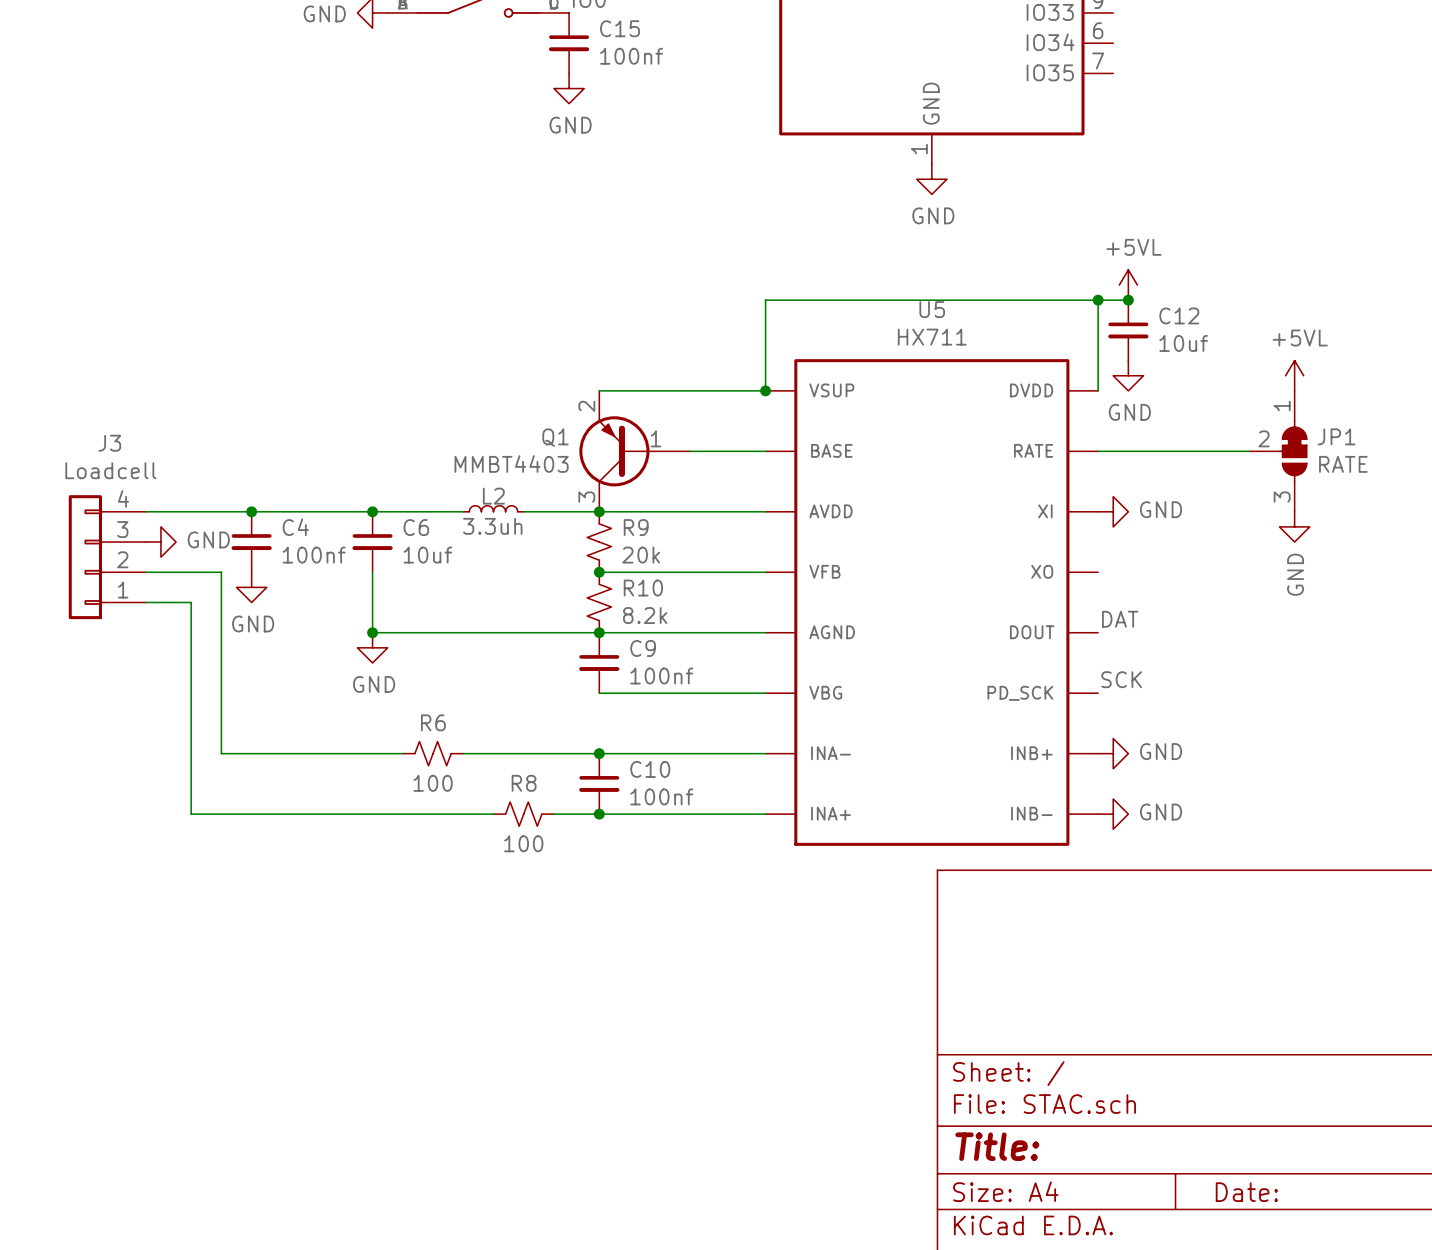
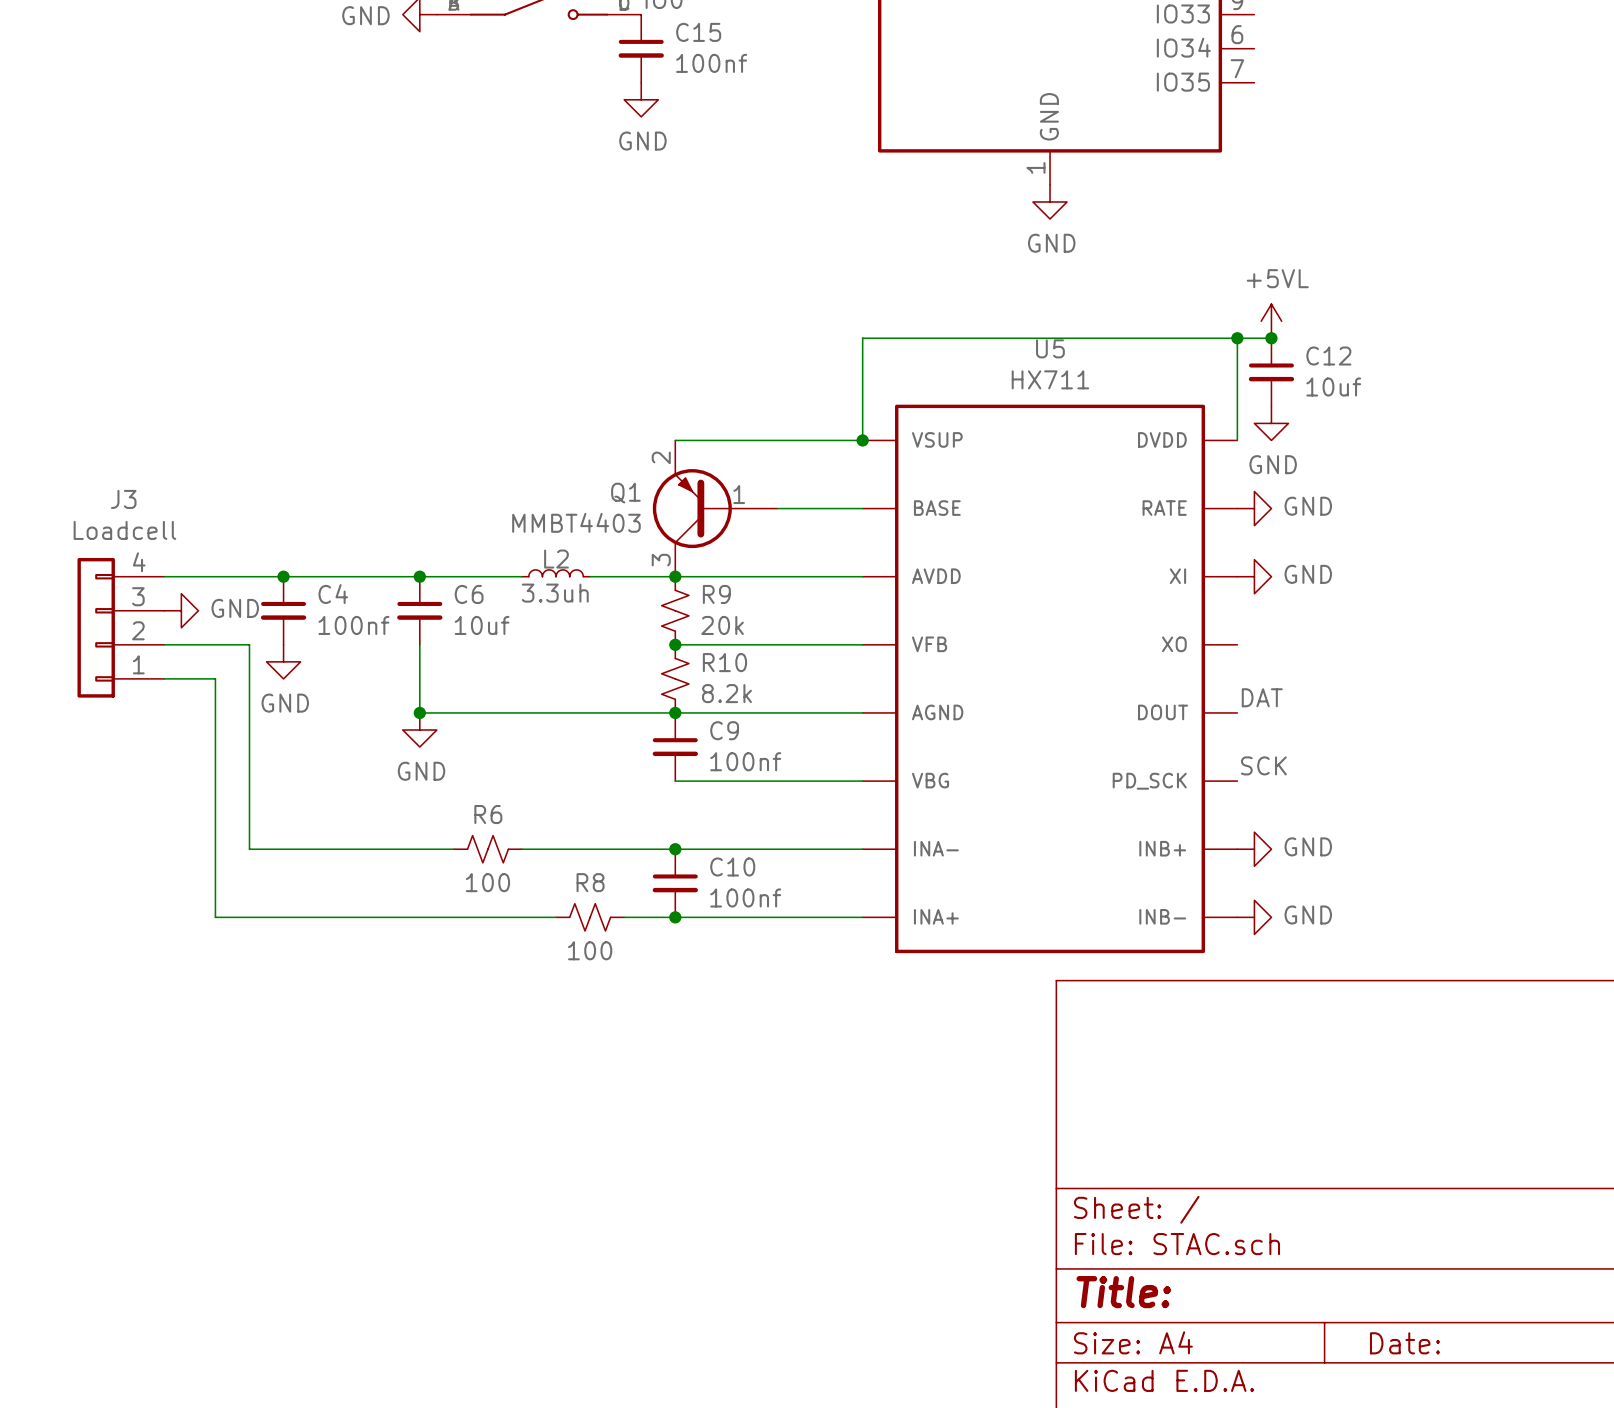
power symbol: +5VL (1294, 375) -> none
wire: (1098, 451) (1249, 451) -> none
JP1: RATE (1278, 451) -> none
power symbol rotation: 0° (1294, 526) -> 90° counterclockwise (1254, 508)
power symbol position: GND (1294, 526) -> GND (1254, 508)

